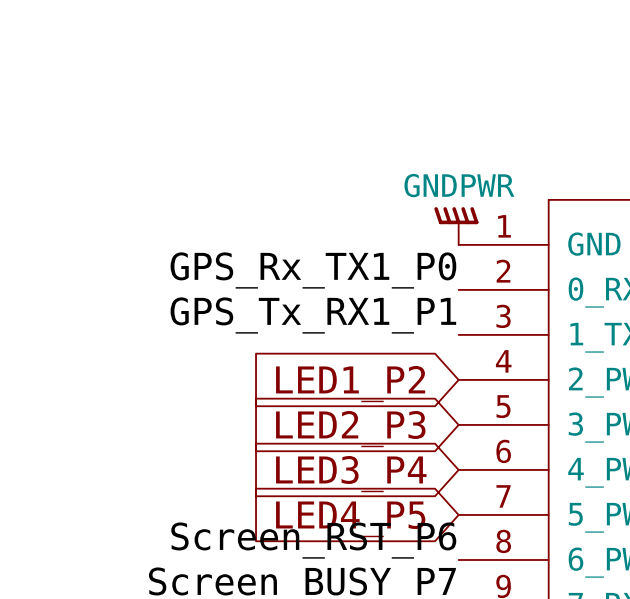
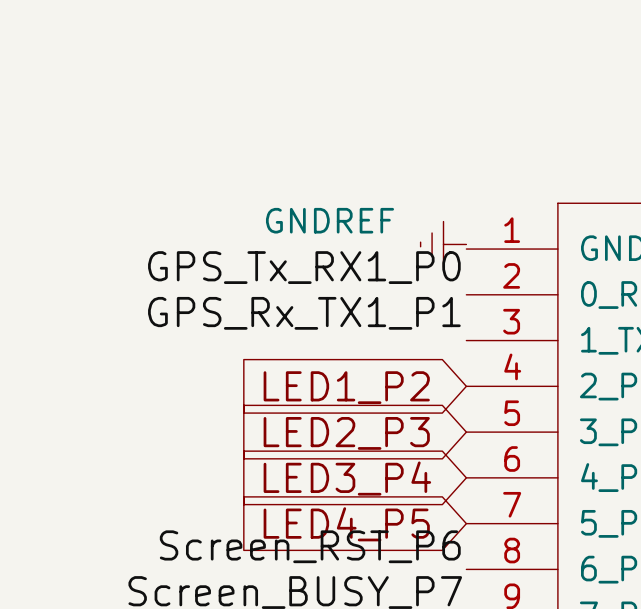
power symbol: GNDPWR (456, 226) -> none
power symbol: none -> GNDREF (443, 244)
label: GPS_Rx_TX1_P0 (313, 270) -> GPS_Tx_RX1_P0 (304, 267)
label: GPS_Tx_RX1_P1 (313, 315) -> GPS_Rx_TX1_P1 (304, 313)

